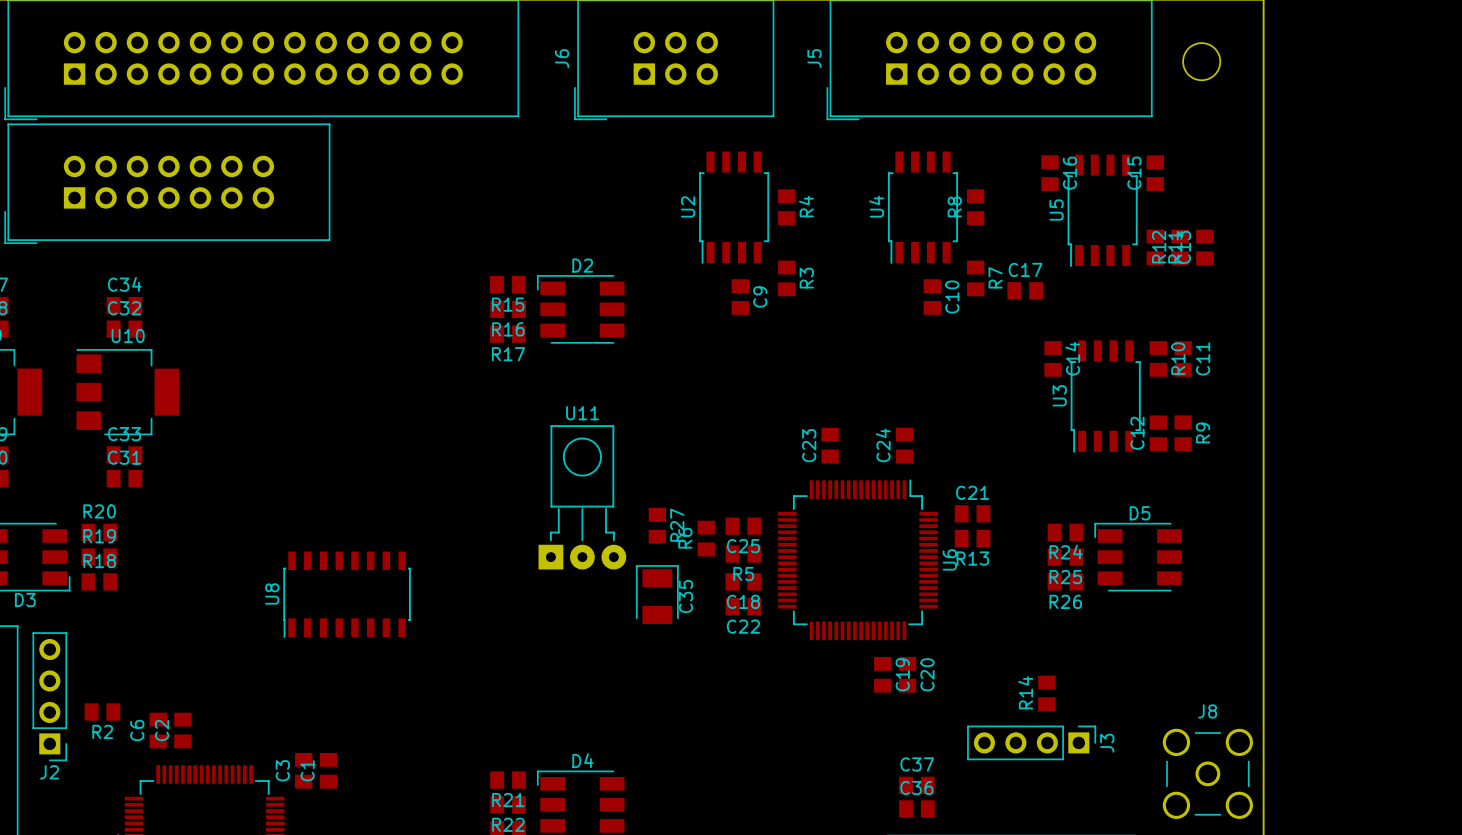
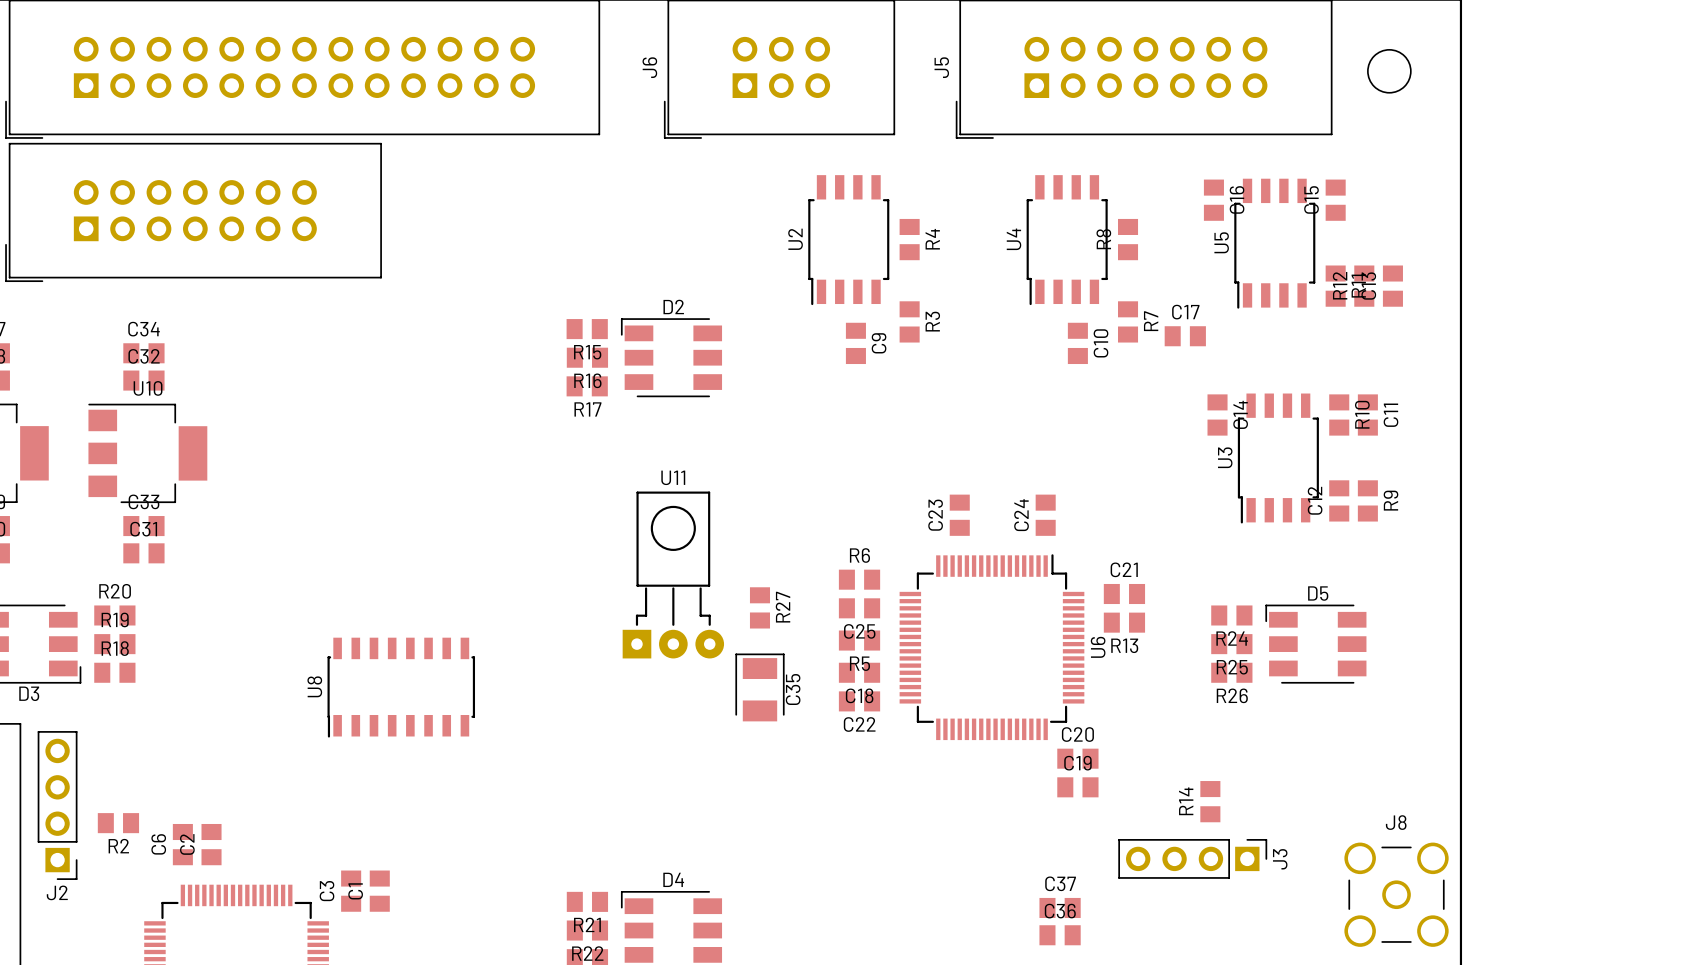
R6 rotation: 0° (706, 538) -> 90° clockwise (859, 579)
R6 position: (706, 538) -> (859, 579)
C19 rotation: 0° (882, 674) -> 90° clockwise (1077, 787)
C19 position: (882, 674) -> (1077, 787)
C19 name position: C19 (902, 674) -> C19 (1077, 763)
C20 rotation: 0° (907, 674) -> 90° clockwise (1077, 758)
C20 position: (907, 674) -> (1077, 758)
C20 name position: C20 (927, 674) -> C20 (1077, 734)

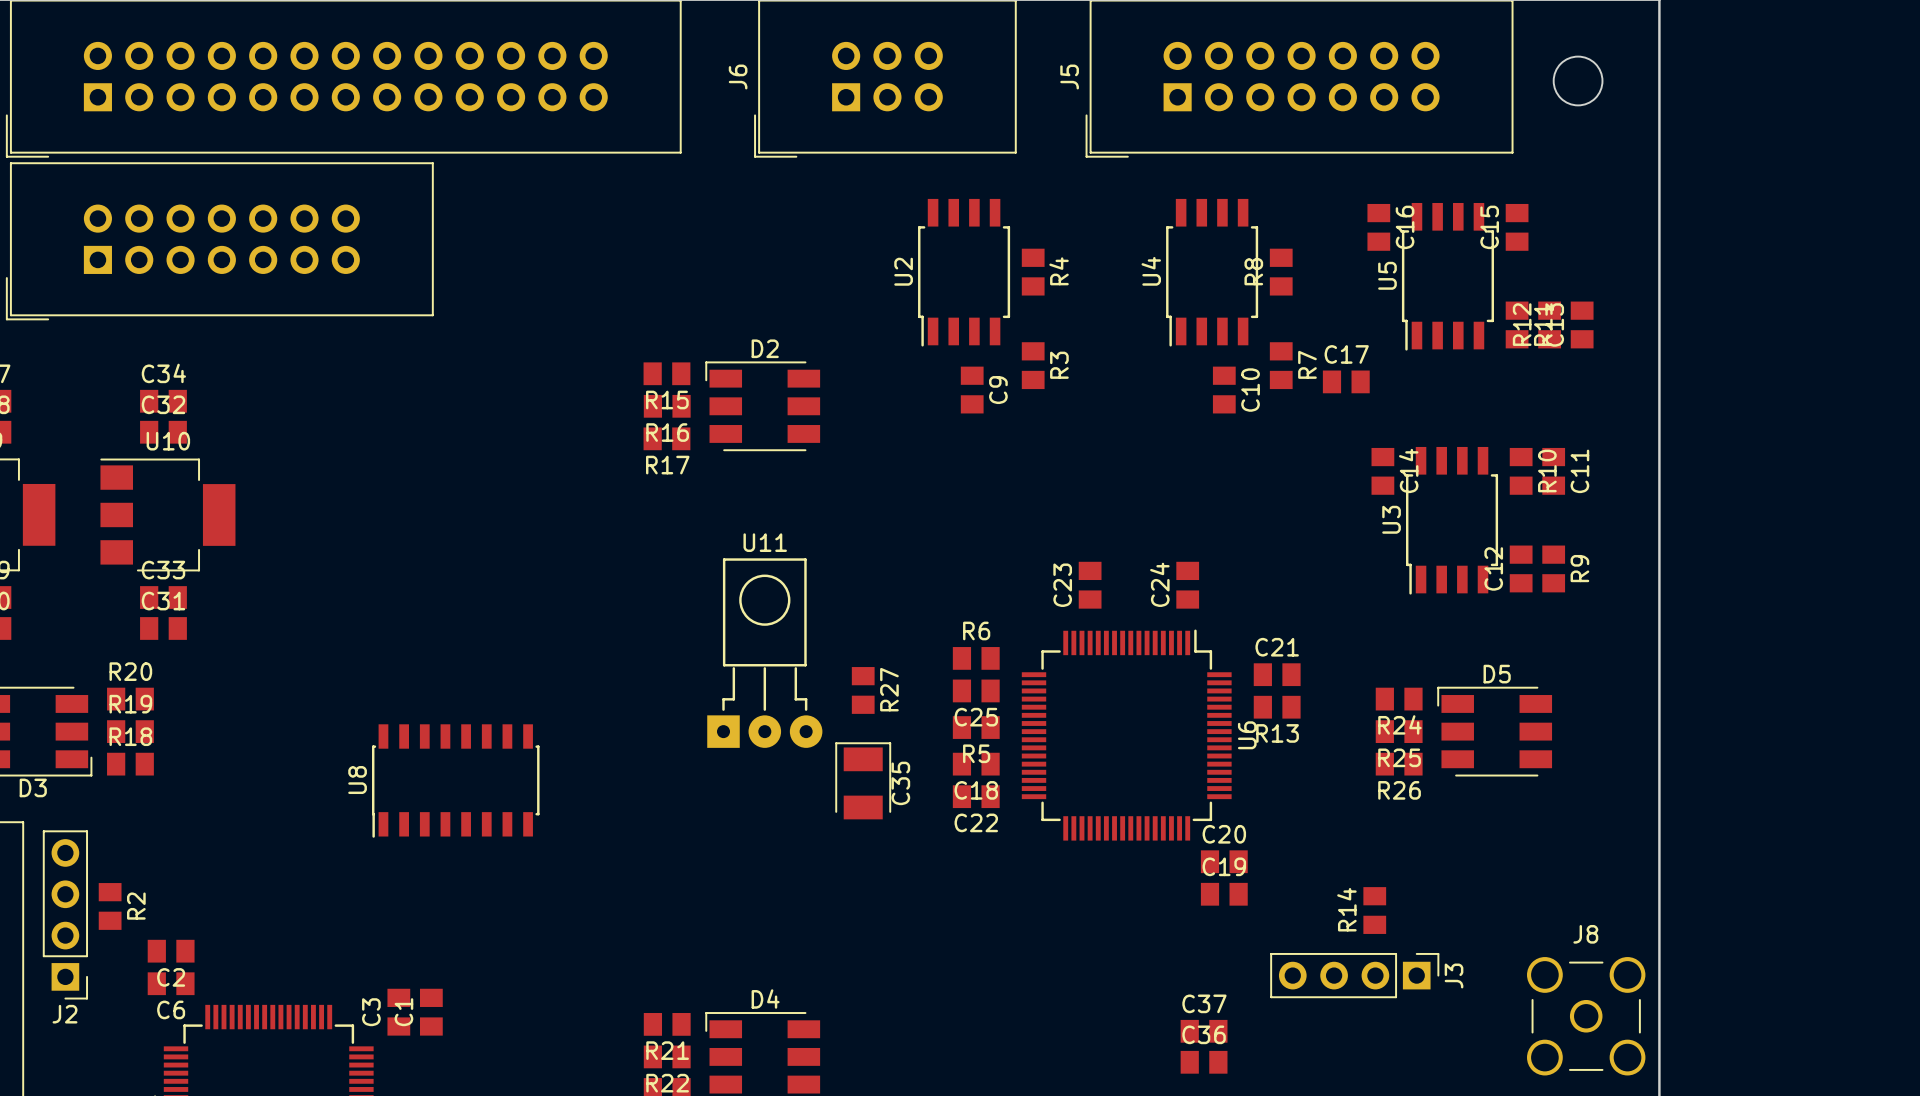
R2 rotation: 0° (118, 823) -> 90° clockwise (110, 906)
R2 position: (118, 823) -> (110, 906)
C6 name position: C6 (158, 844) -> C6 (171, 1009)
C6 rotation: 0° (182, 844) -> 90° clockwise (171, 983)
C6 position: (182, 844) -> (171, 983)
C2 name position: C2 (187, 844) -> C2 (171, 977)
C2 rotation: 0° (211, 844) -> 90° clockwise (171, 951)
C2 position: (211, 844) -> (171, 951)
R2 name position: R2 (118, 846) -> R2 (136, 906)

